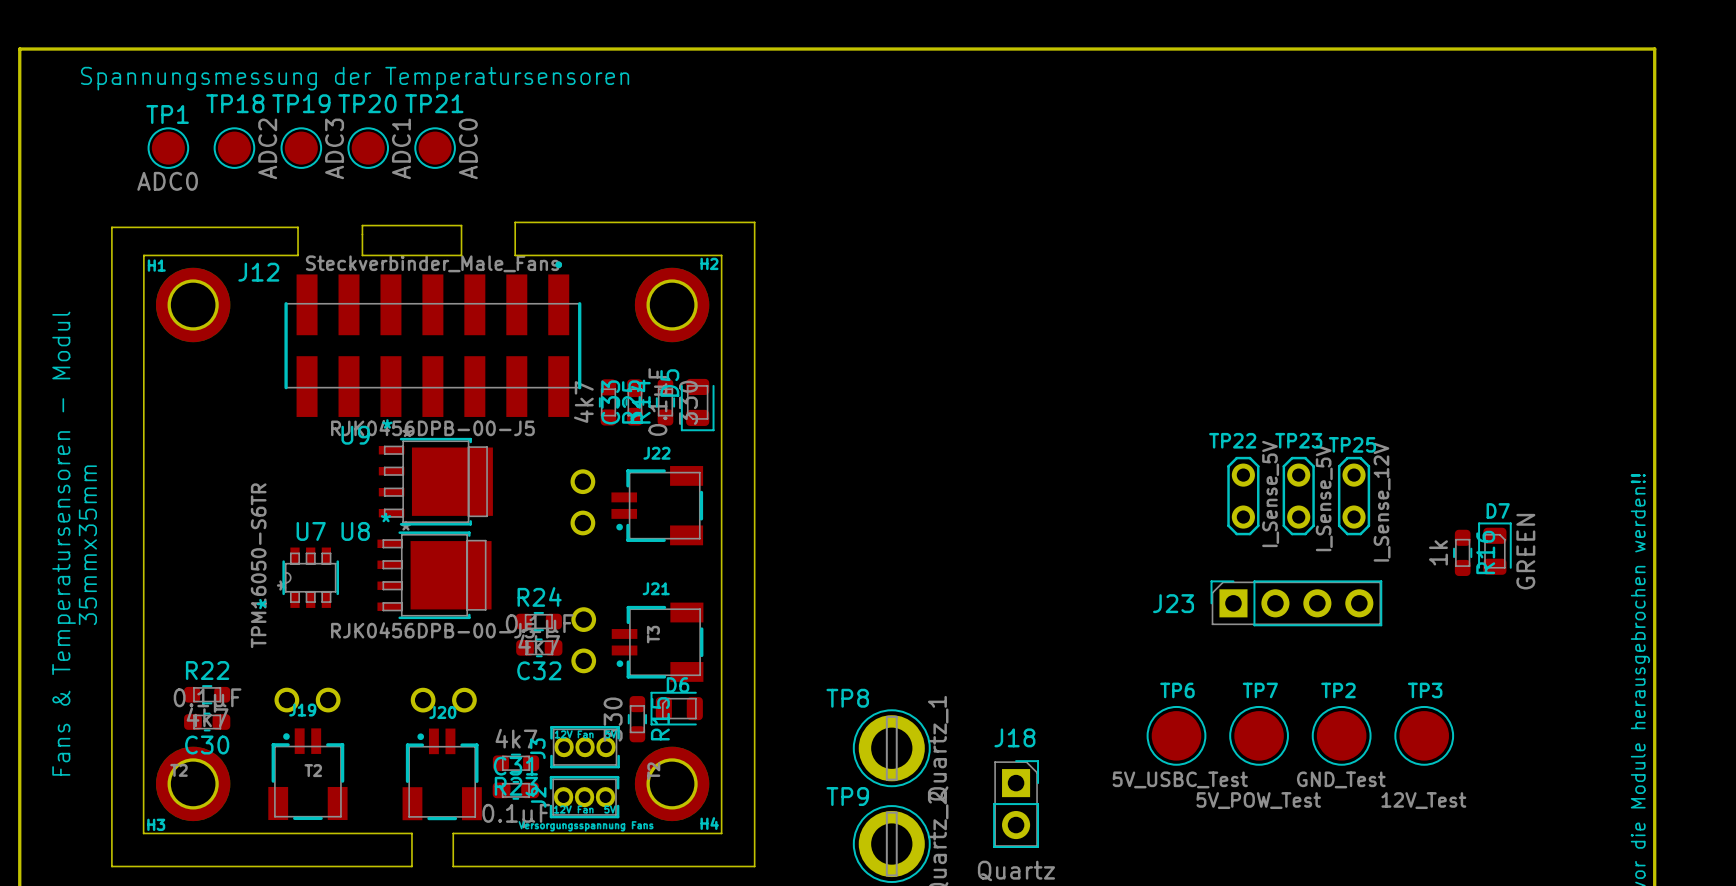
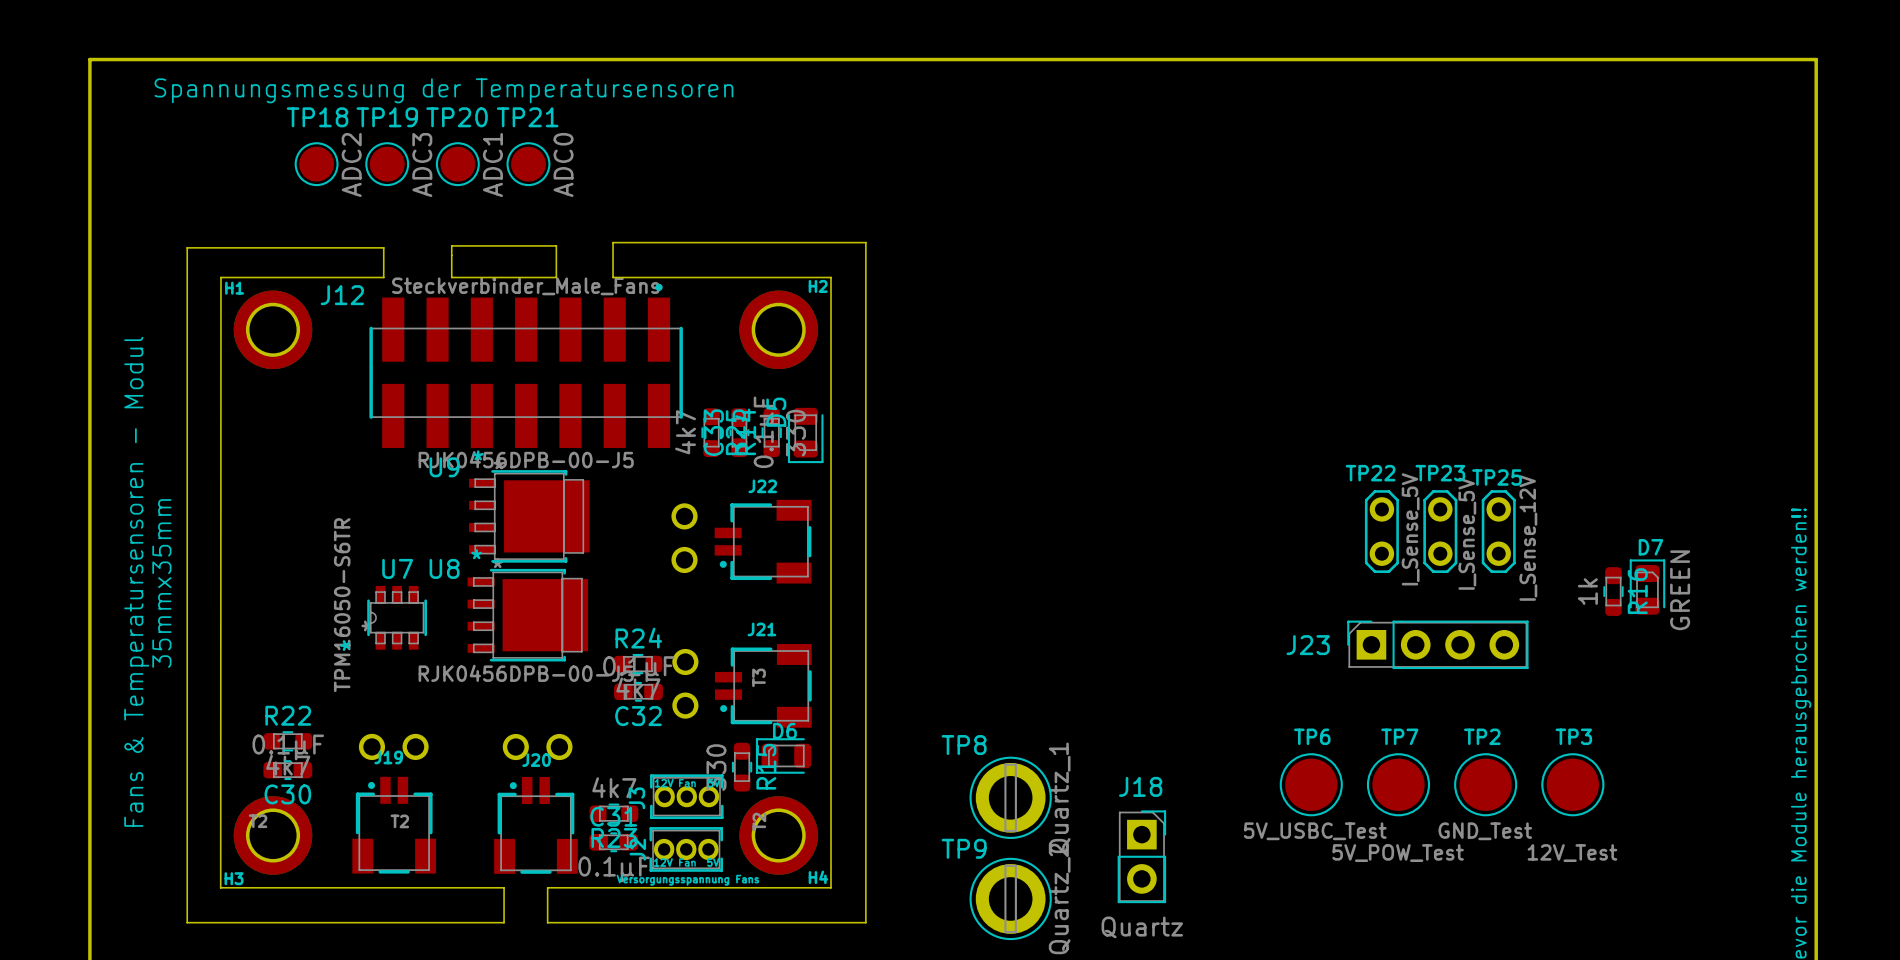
TP1: ADC0 (168, 148) -> none

